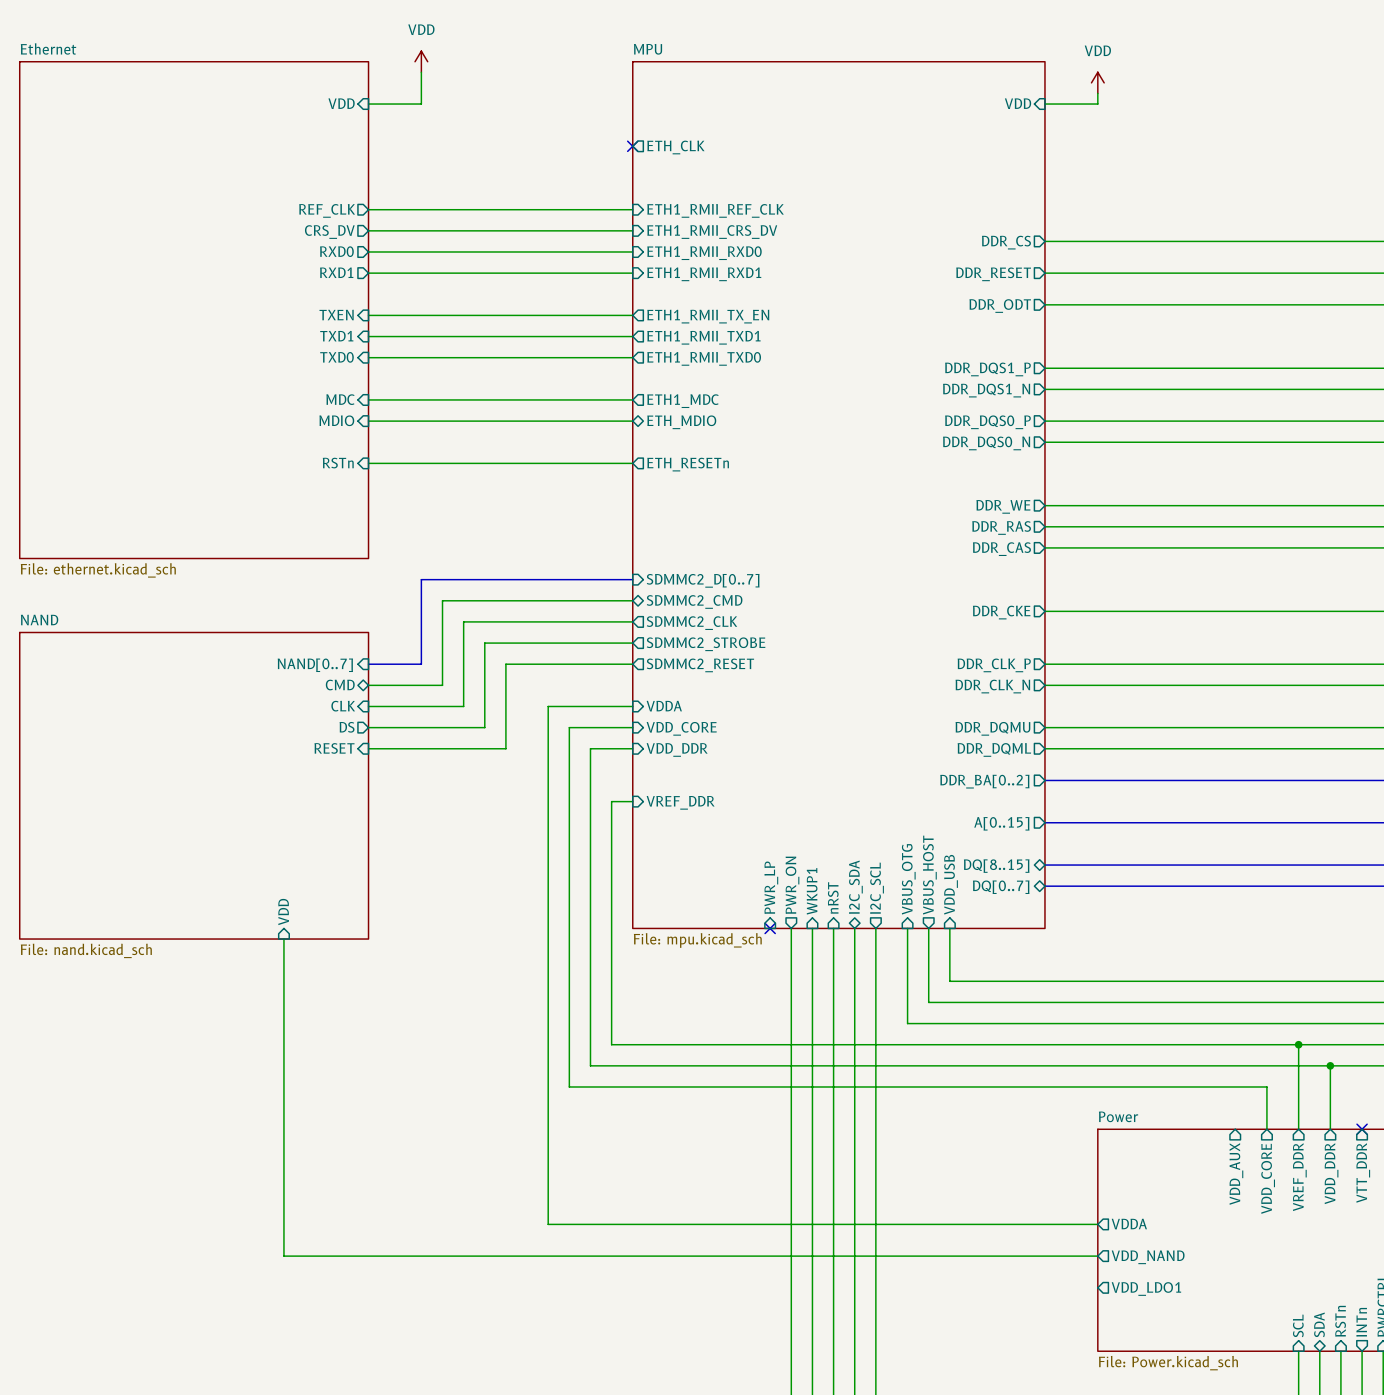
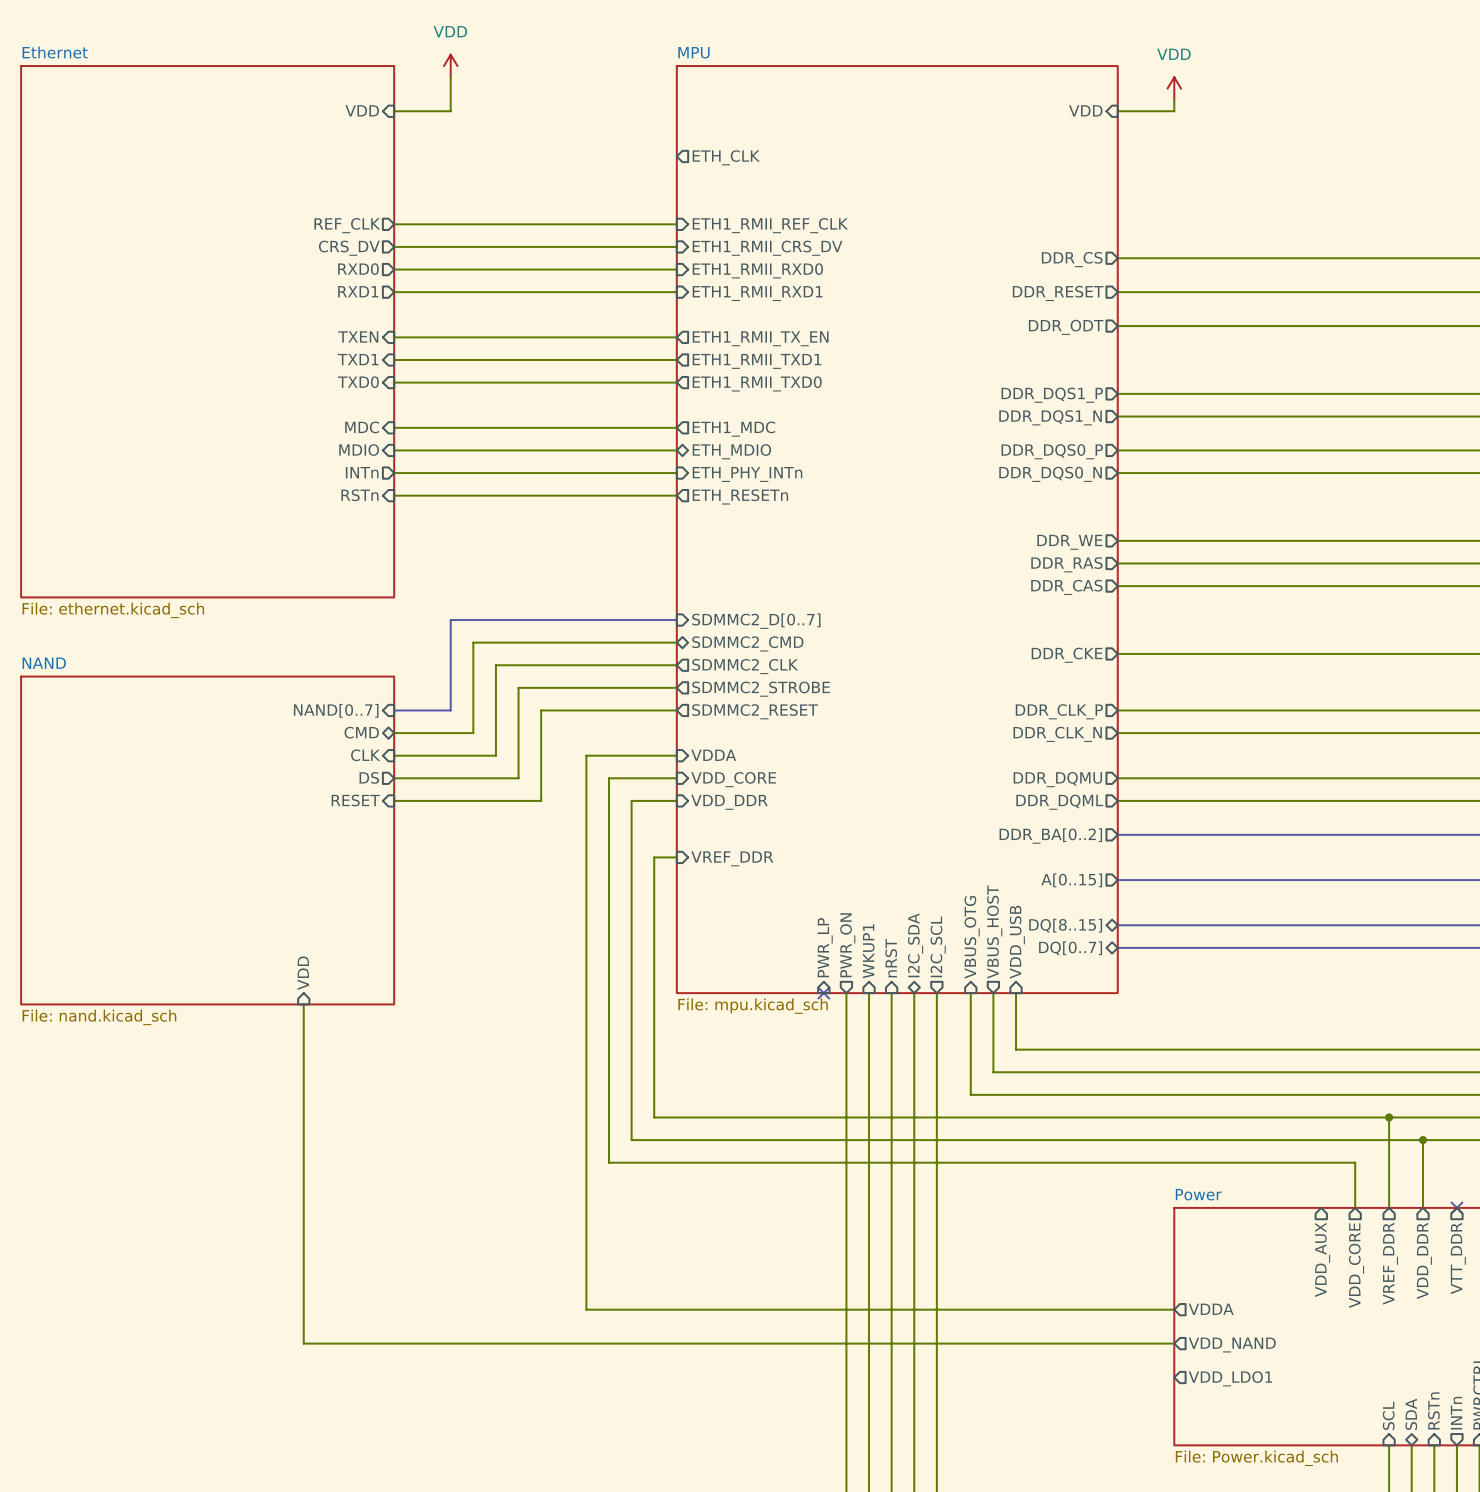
no-connect mark: (632, 146) -> none
sheet pin: none -> INTn (362, 472)
wire: none -> (394, 473) (676, 473)
sheet pin: none -> ETH_PHY_INTn (747, 474)

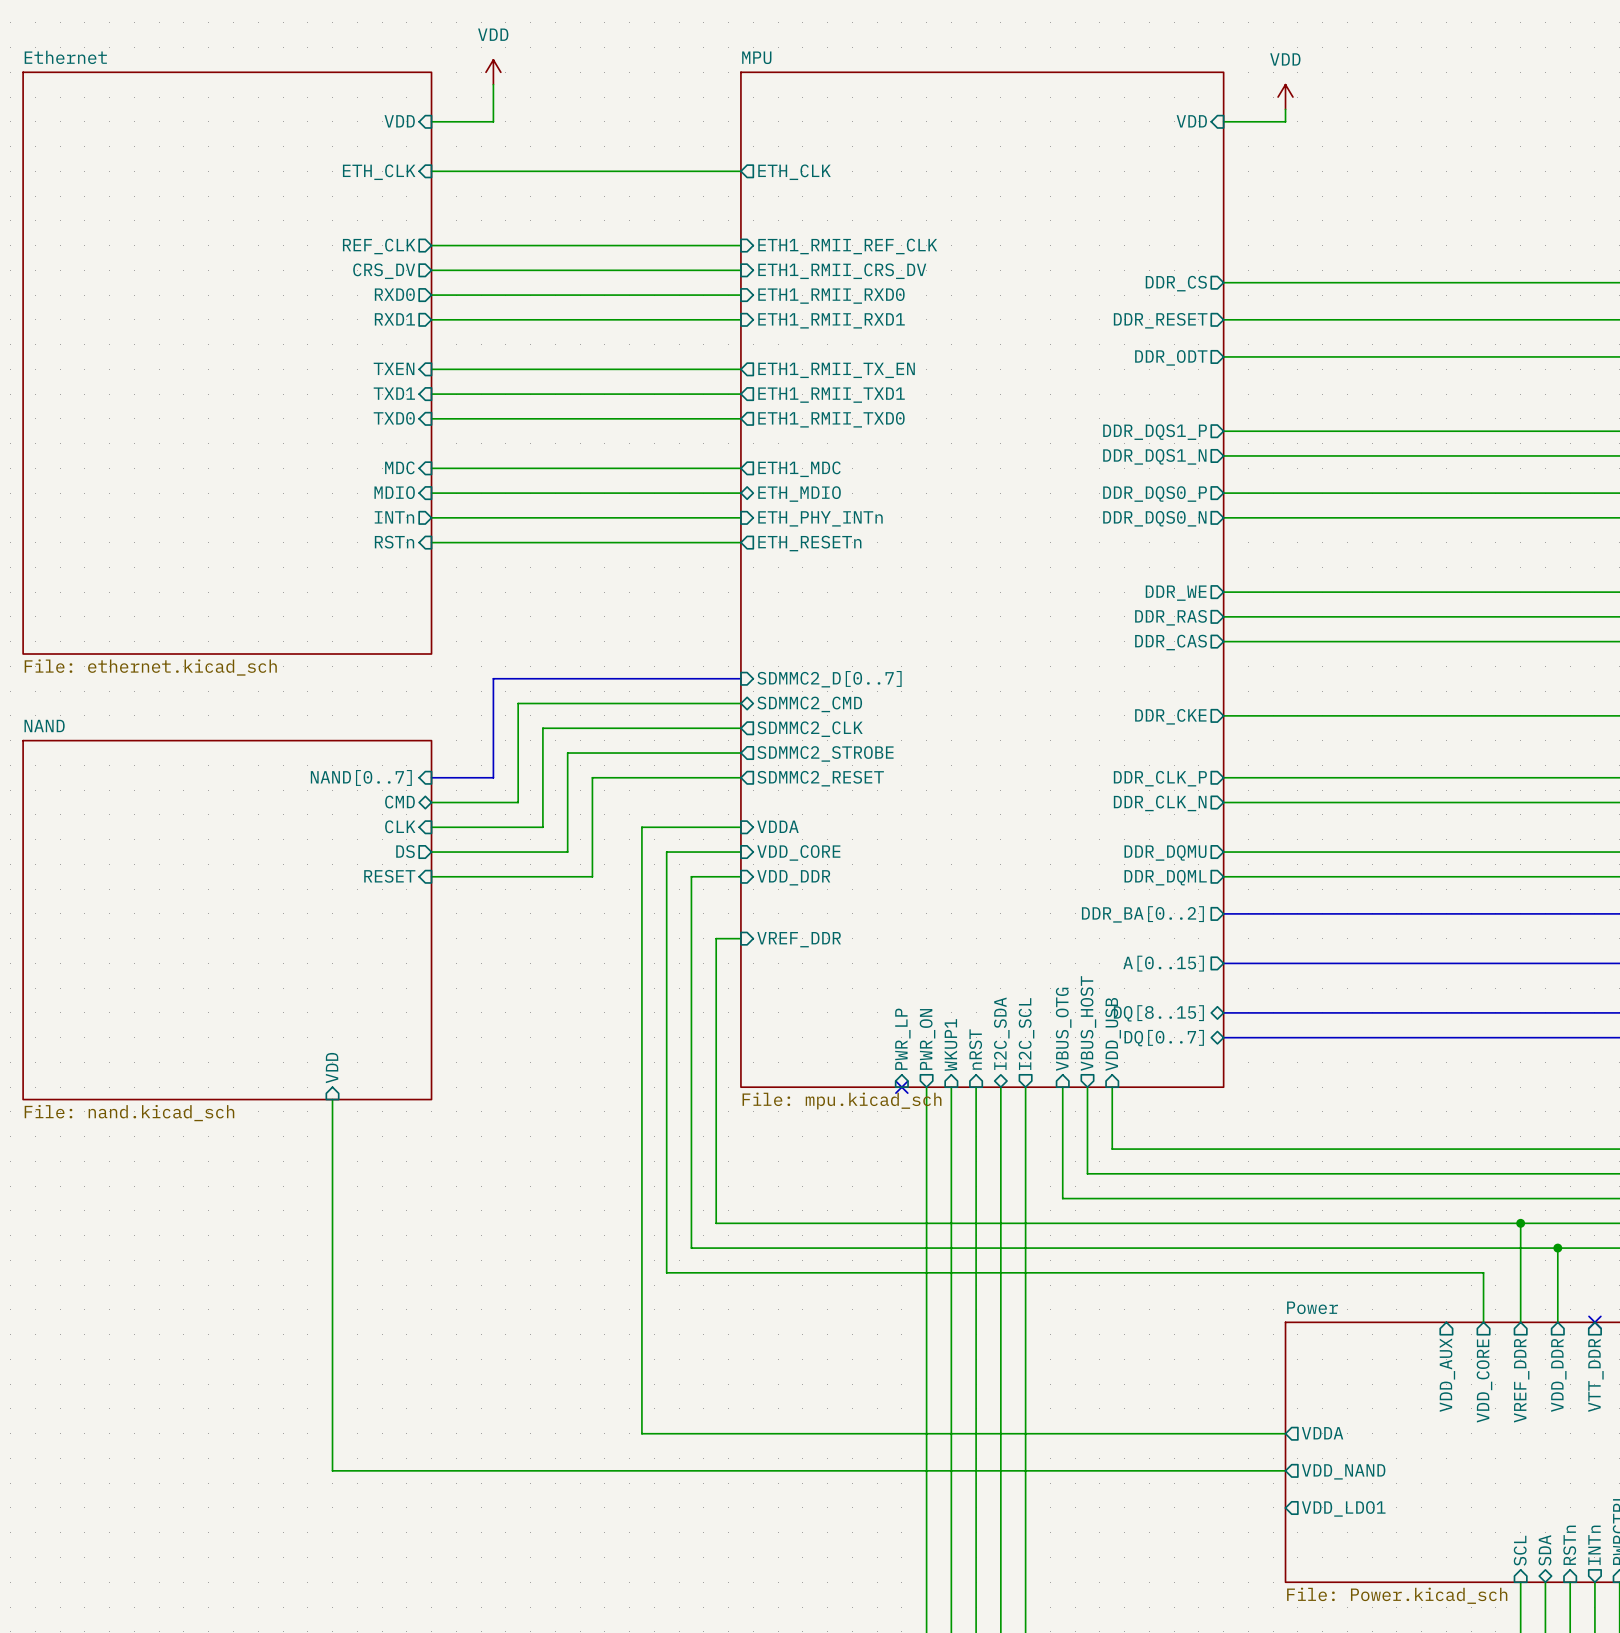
wire: none -> (431, 171) (740, 171)
sheet pin: none -> ETH_CLK (379, 172)

